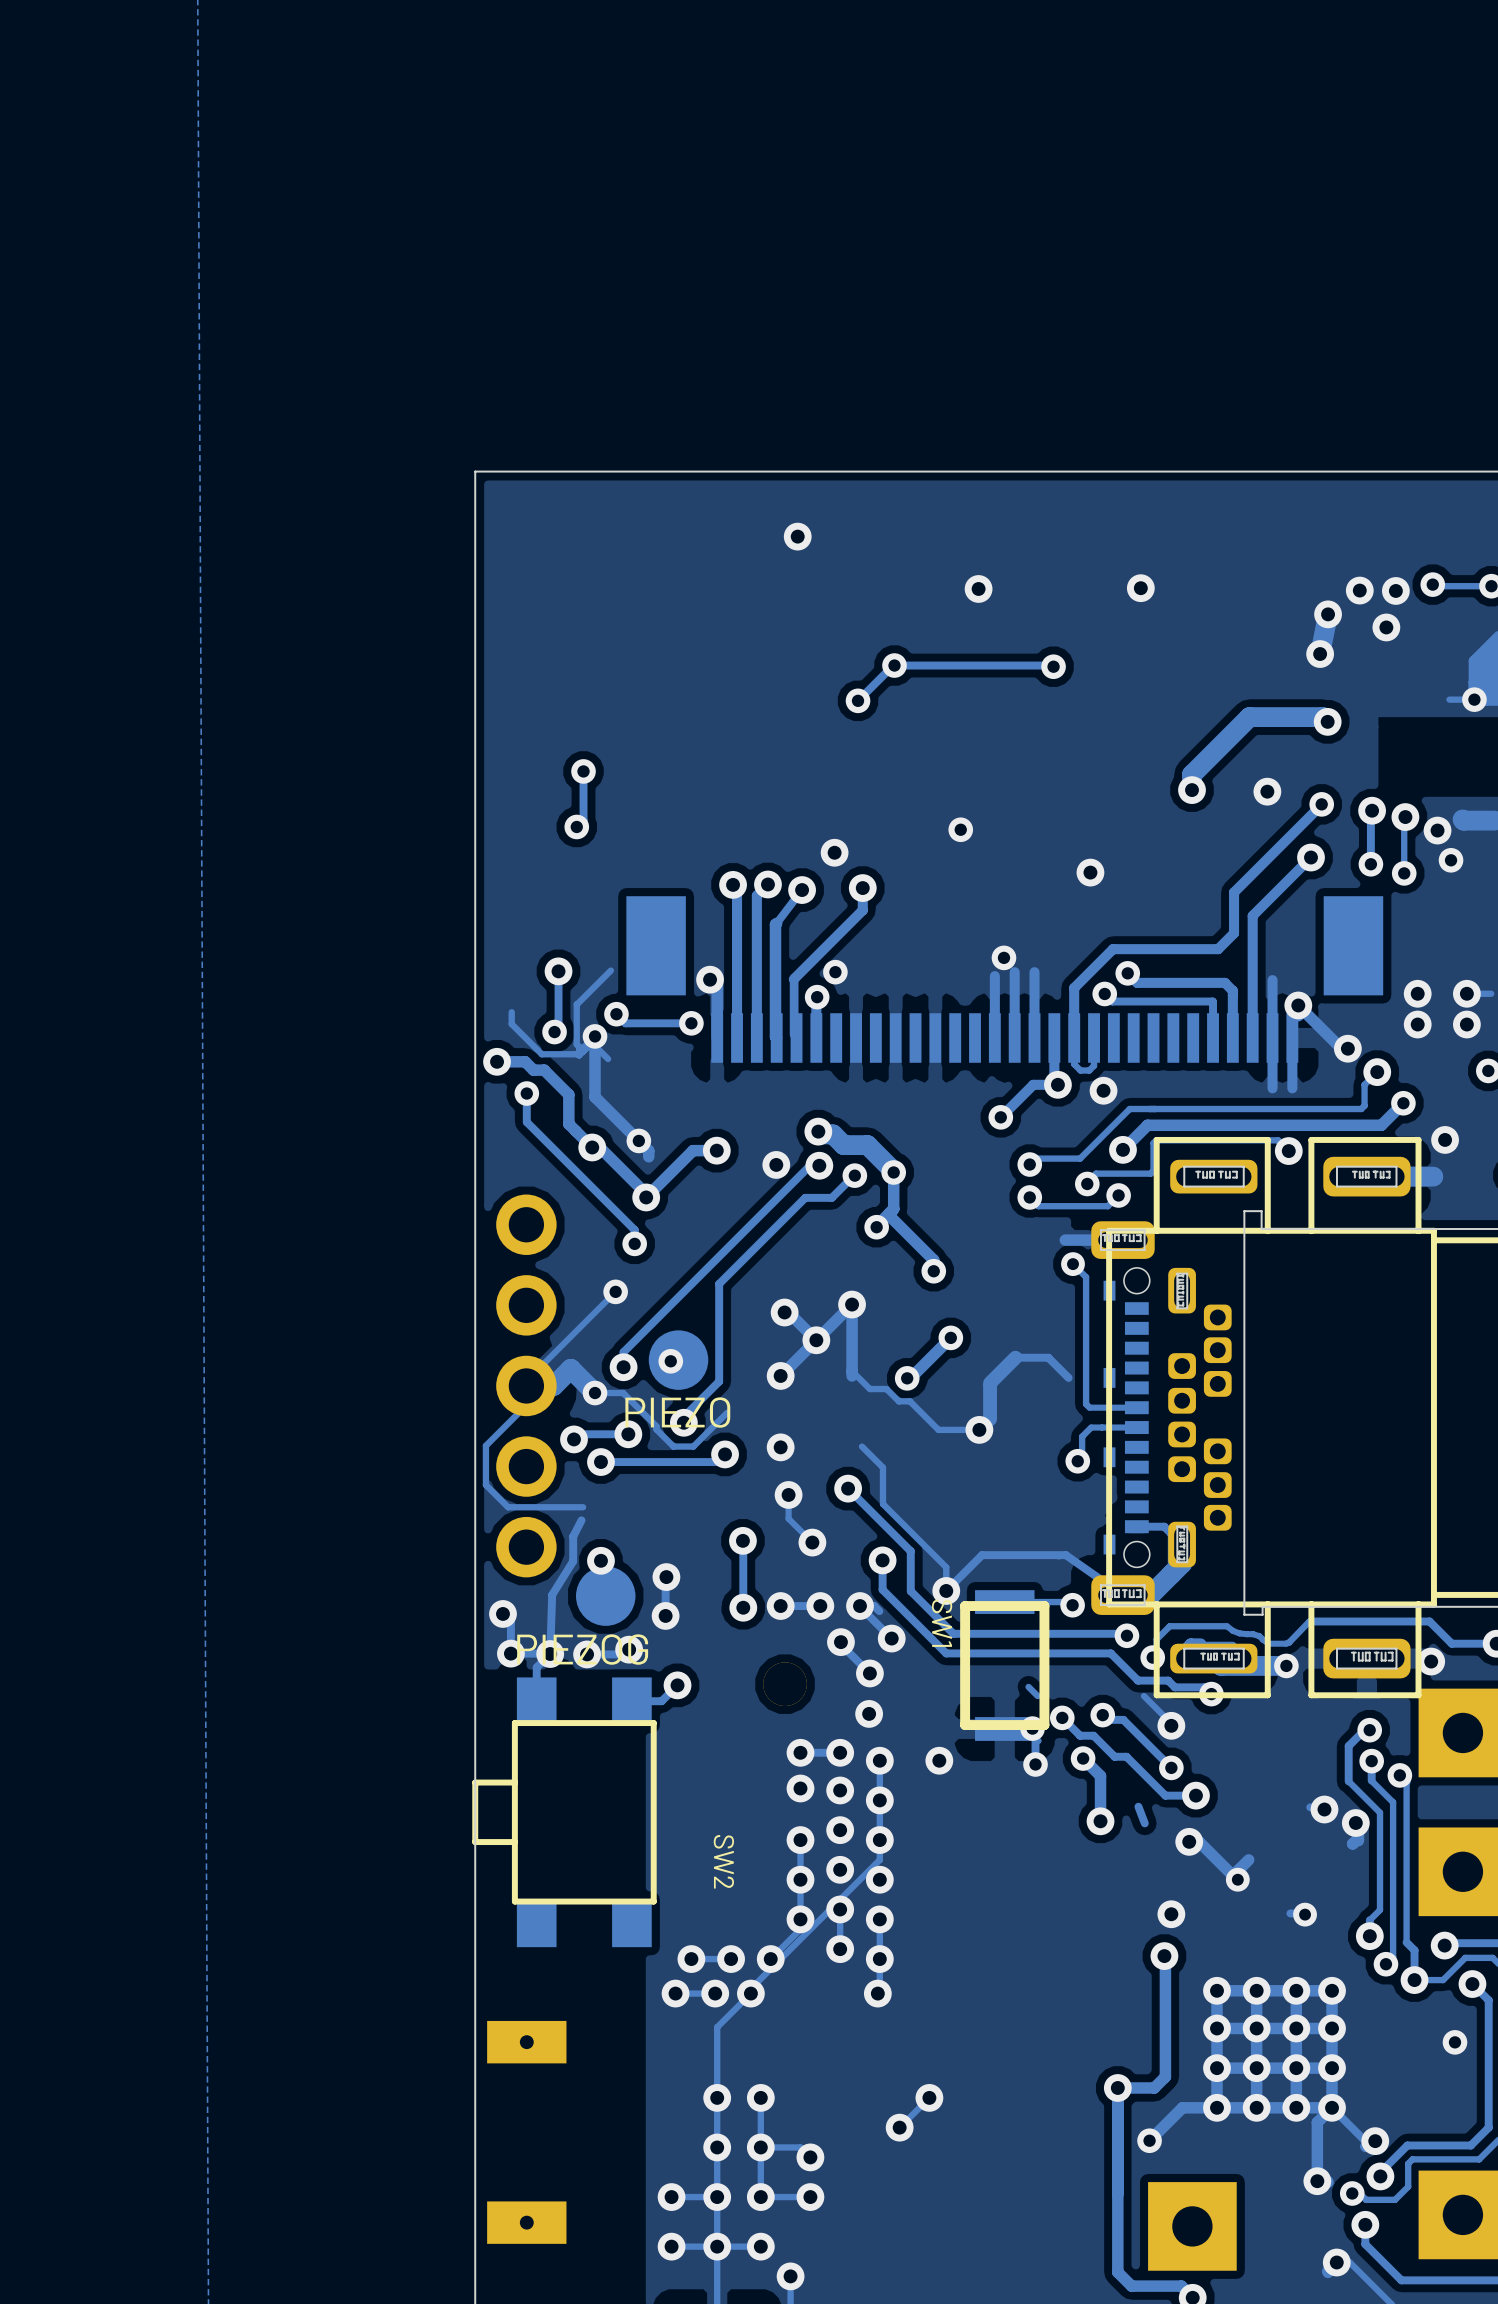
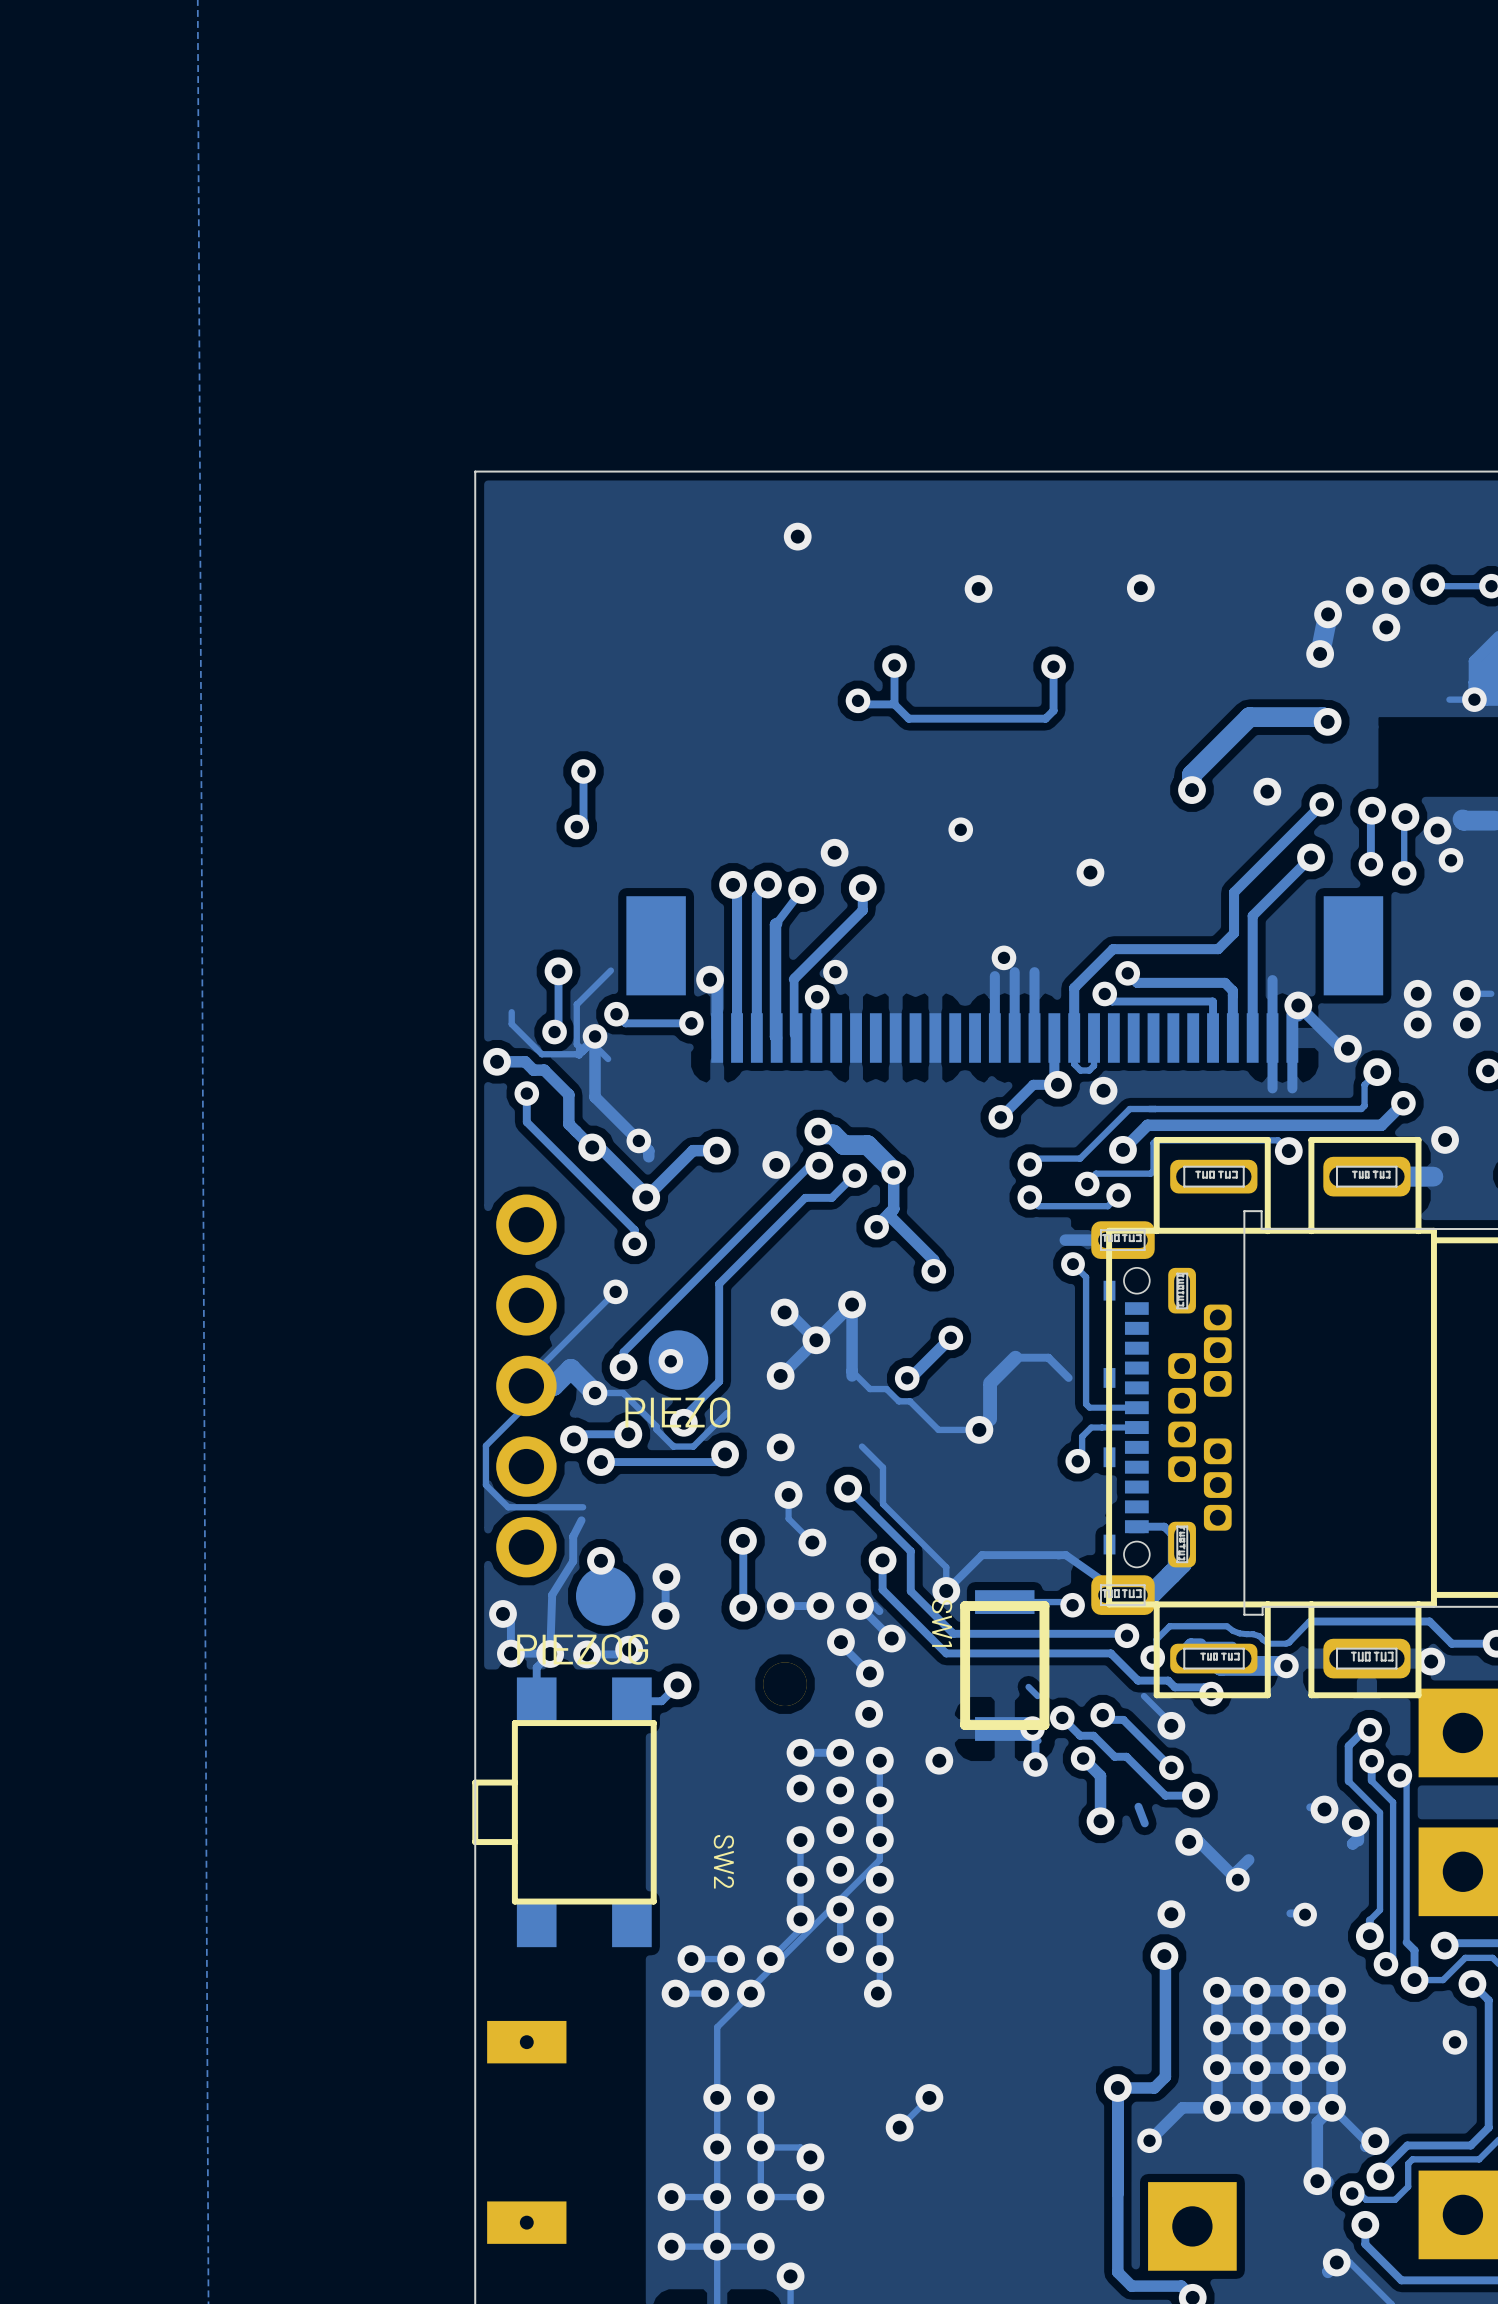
track: (893, 665) (858, 700) -> (894, 665) (894, 704)
track: (1052, 665) (894, 665) -> none
track: none -> (1053, 666) (1053, 710) (1045, 718) (908, 718) (894, 704)
track: none -> (858, 700) (861, 704) (894, 704)

